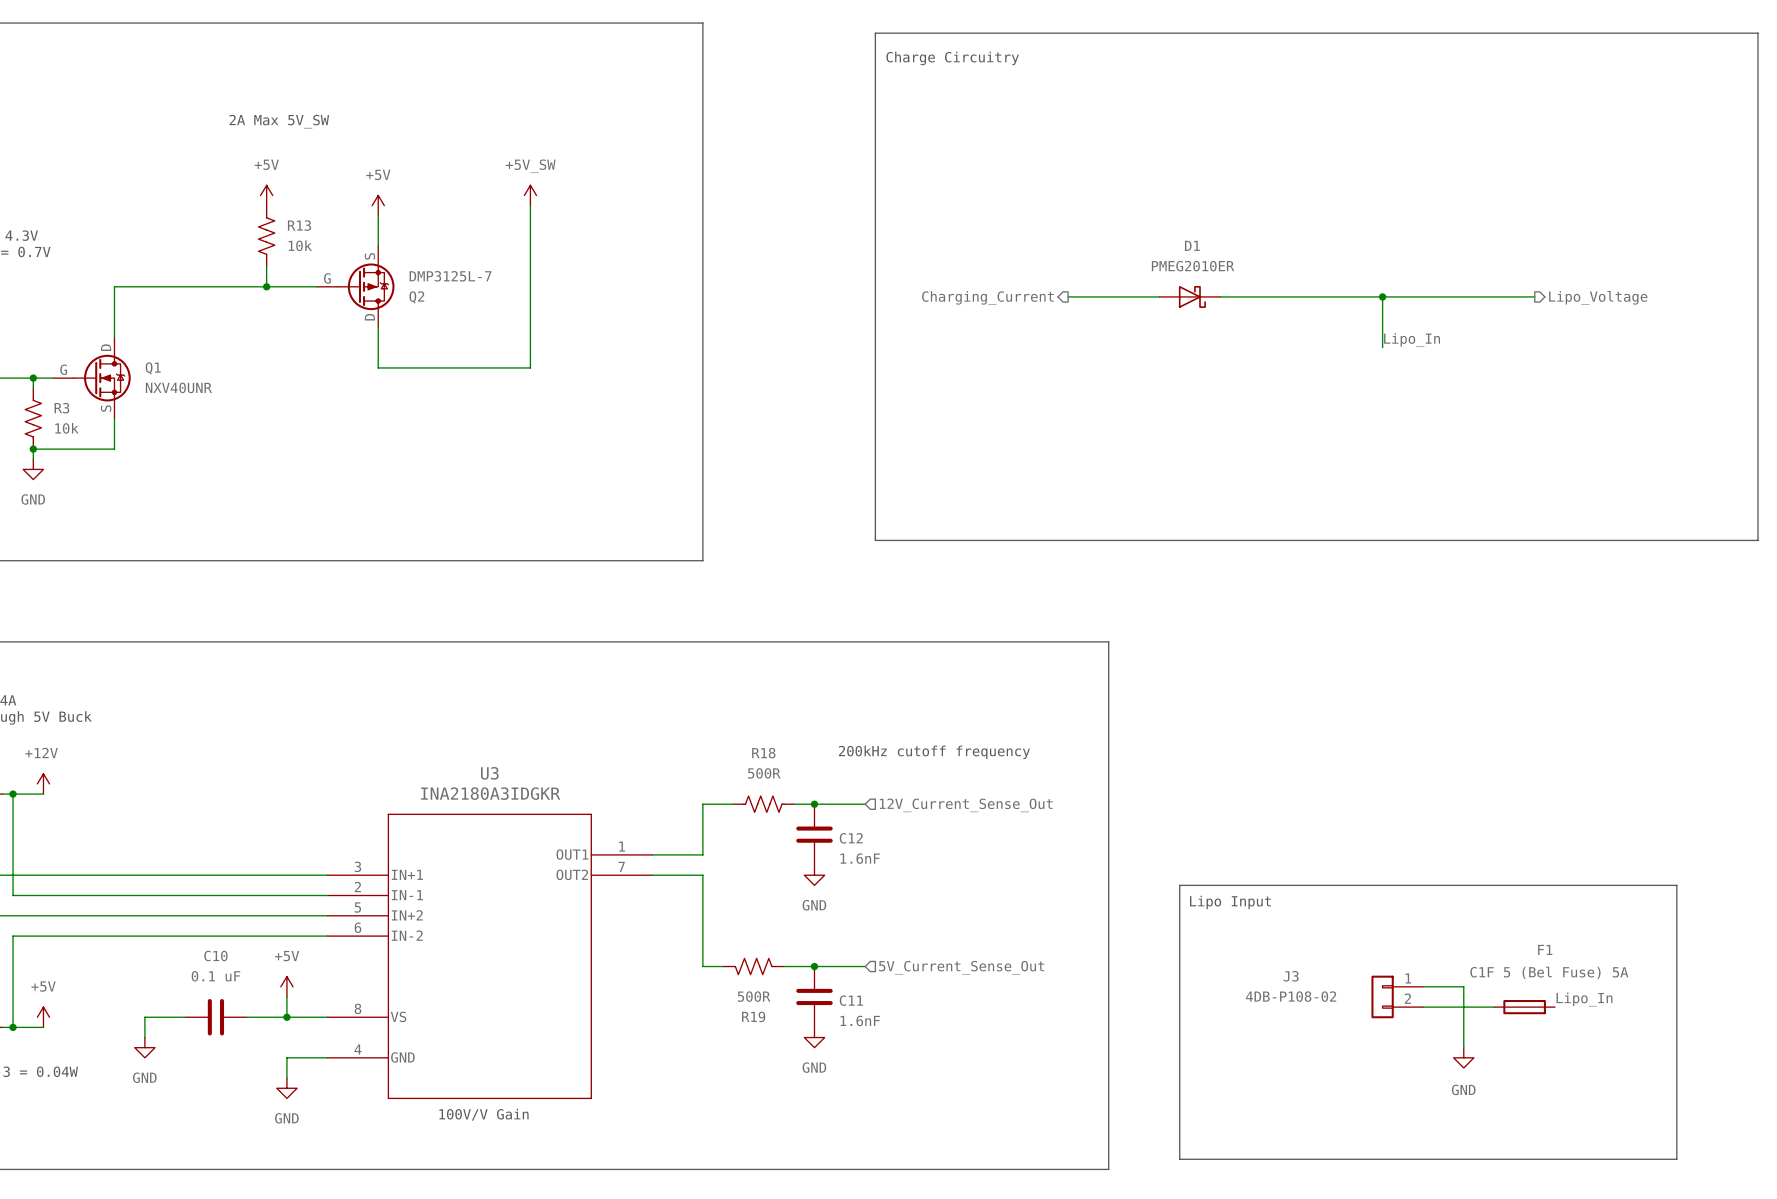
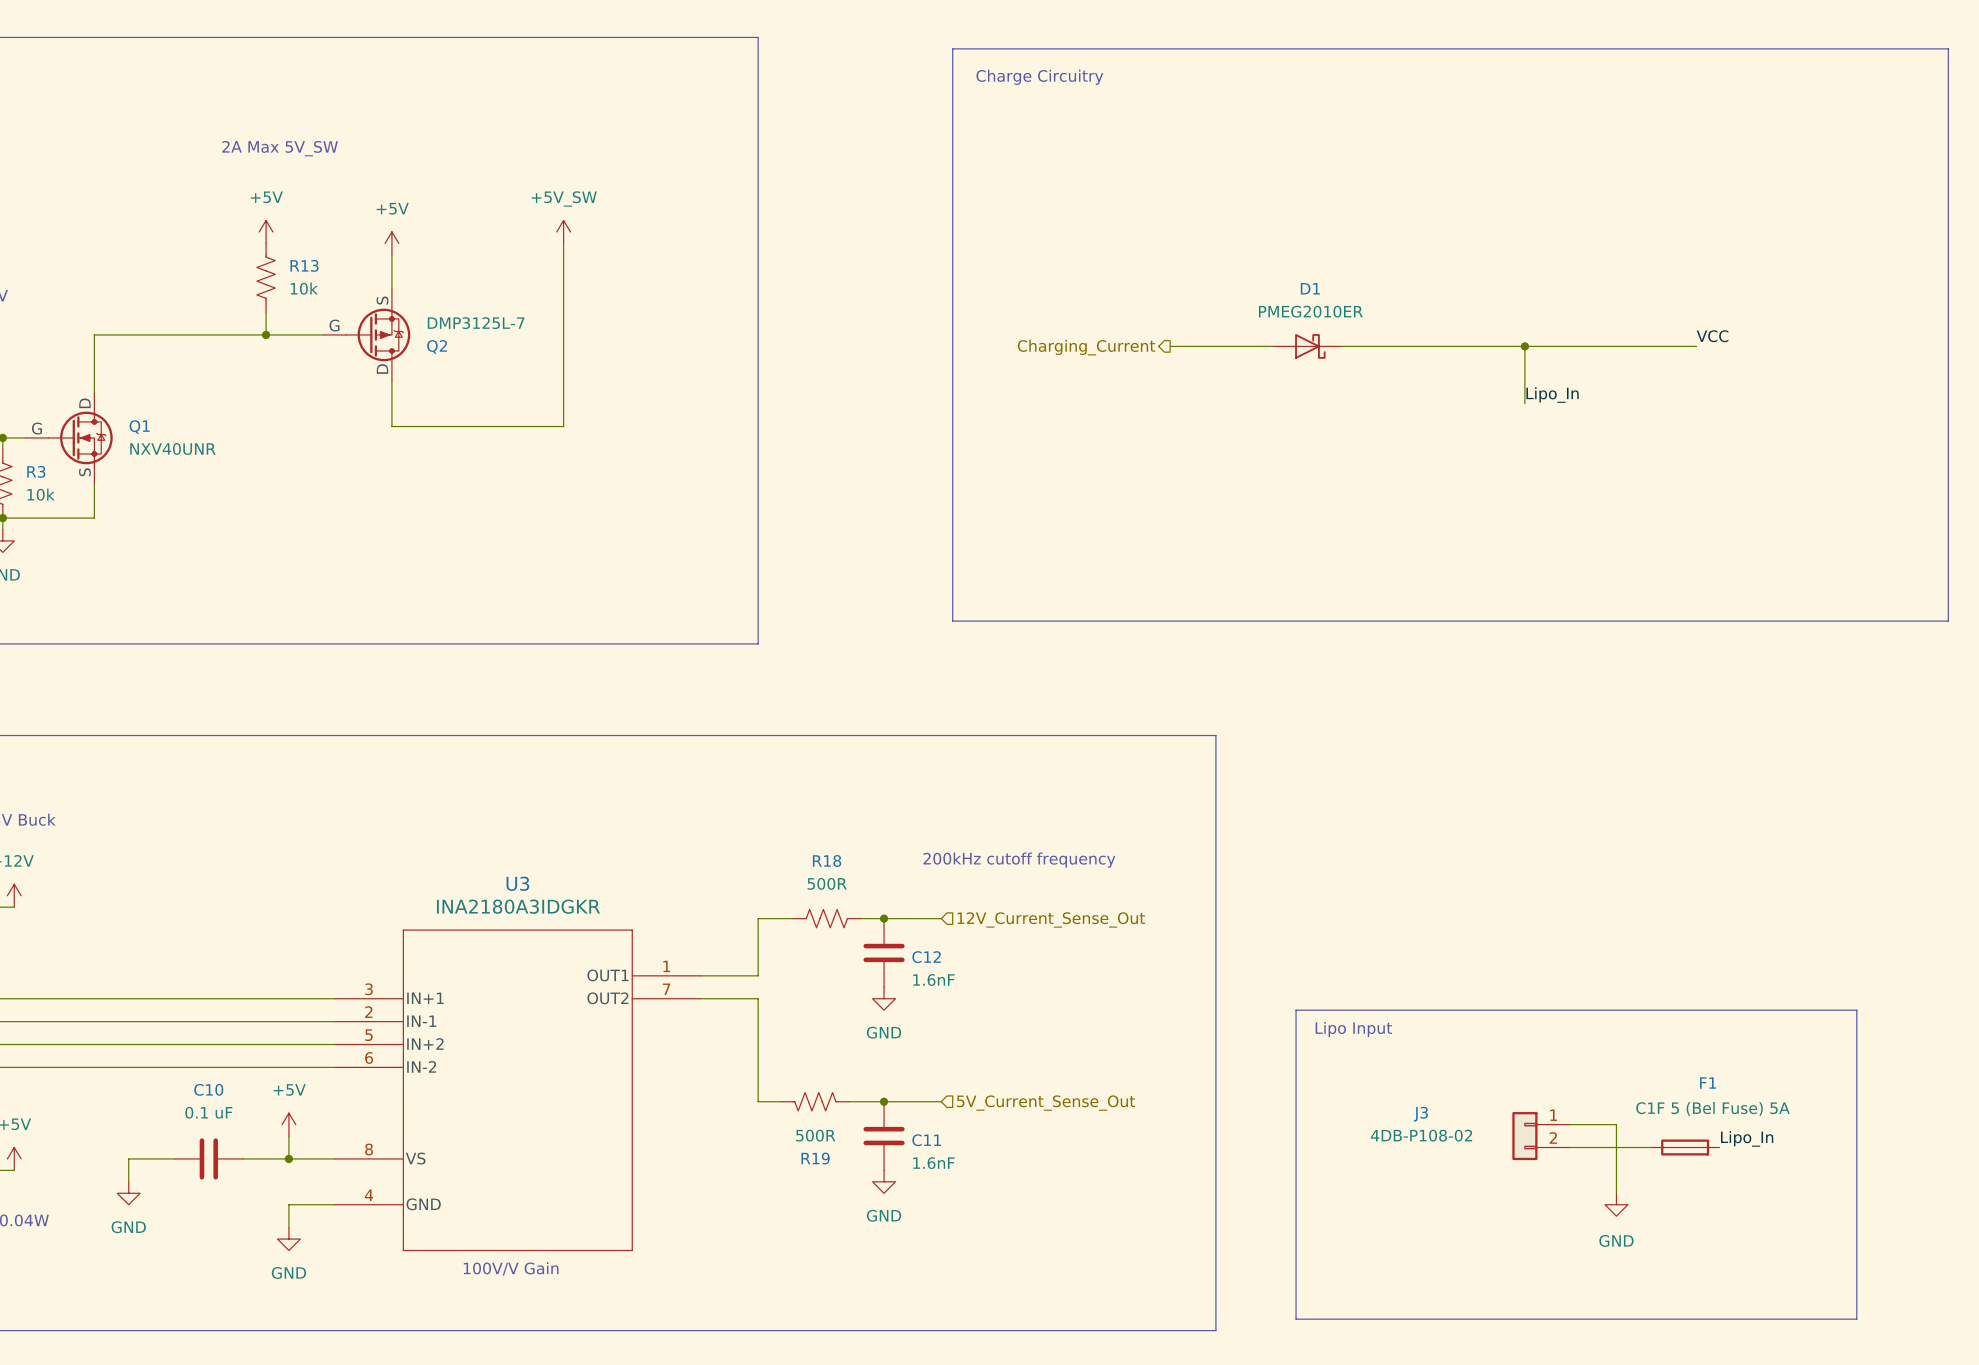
label: none -> VCC (1712, 336)
hierarchical label: Lipo_Voltage (1598, 297) -> none

